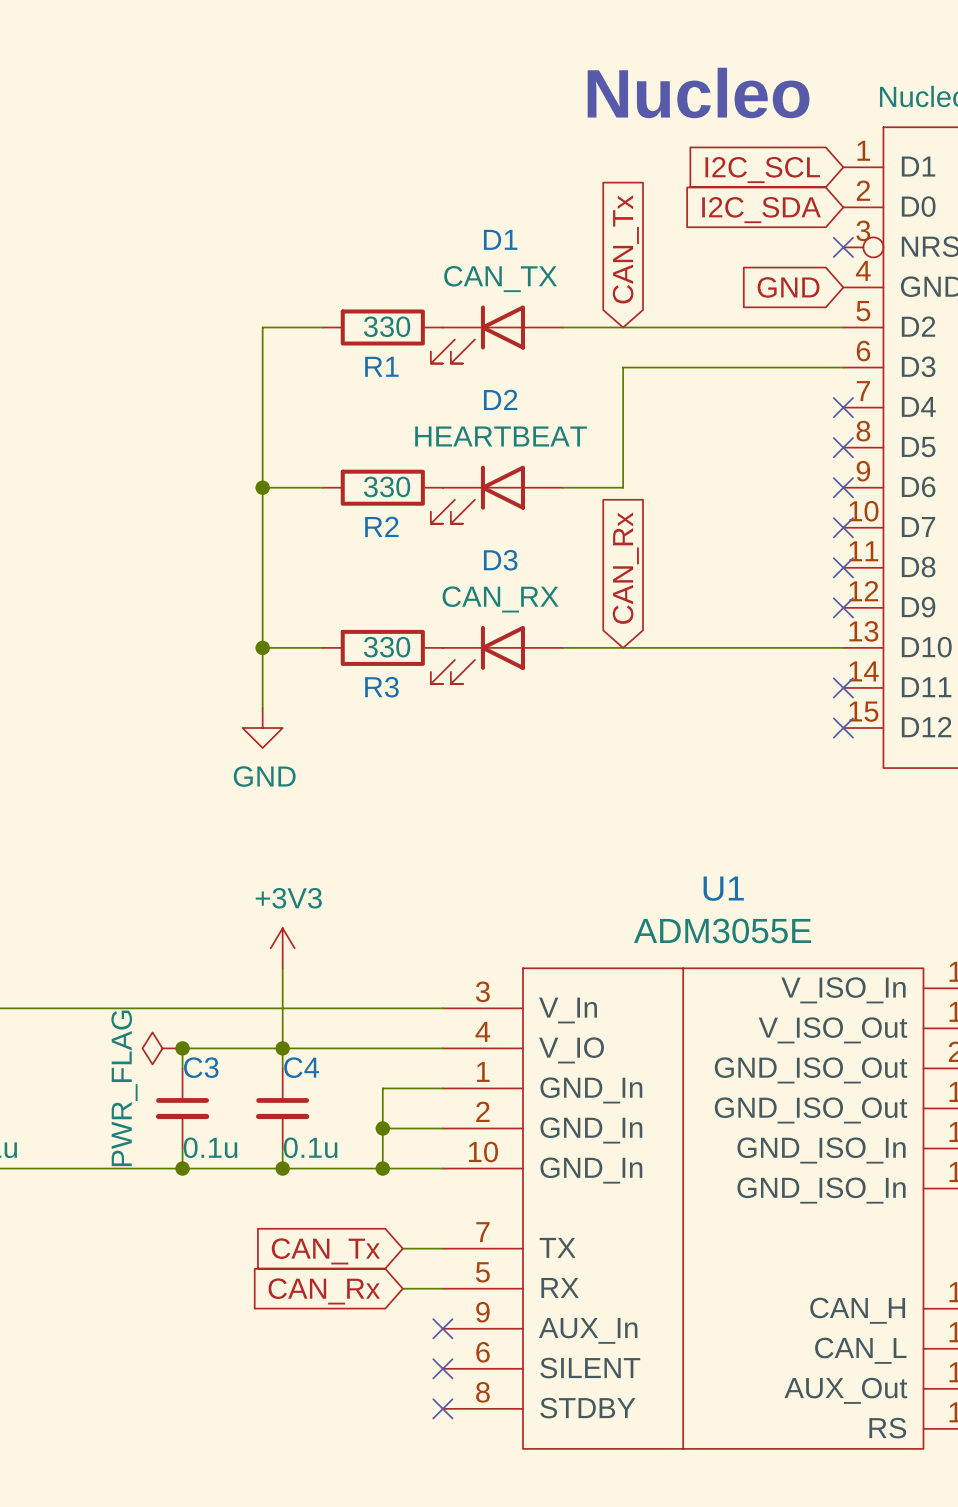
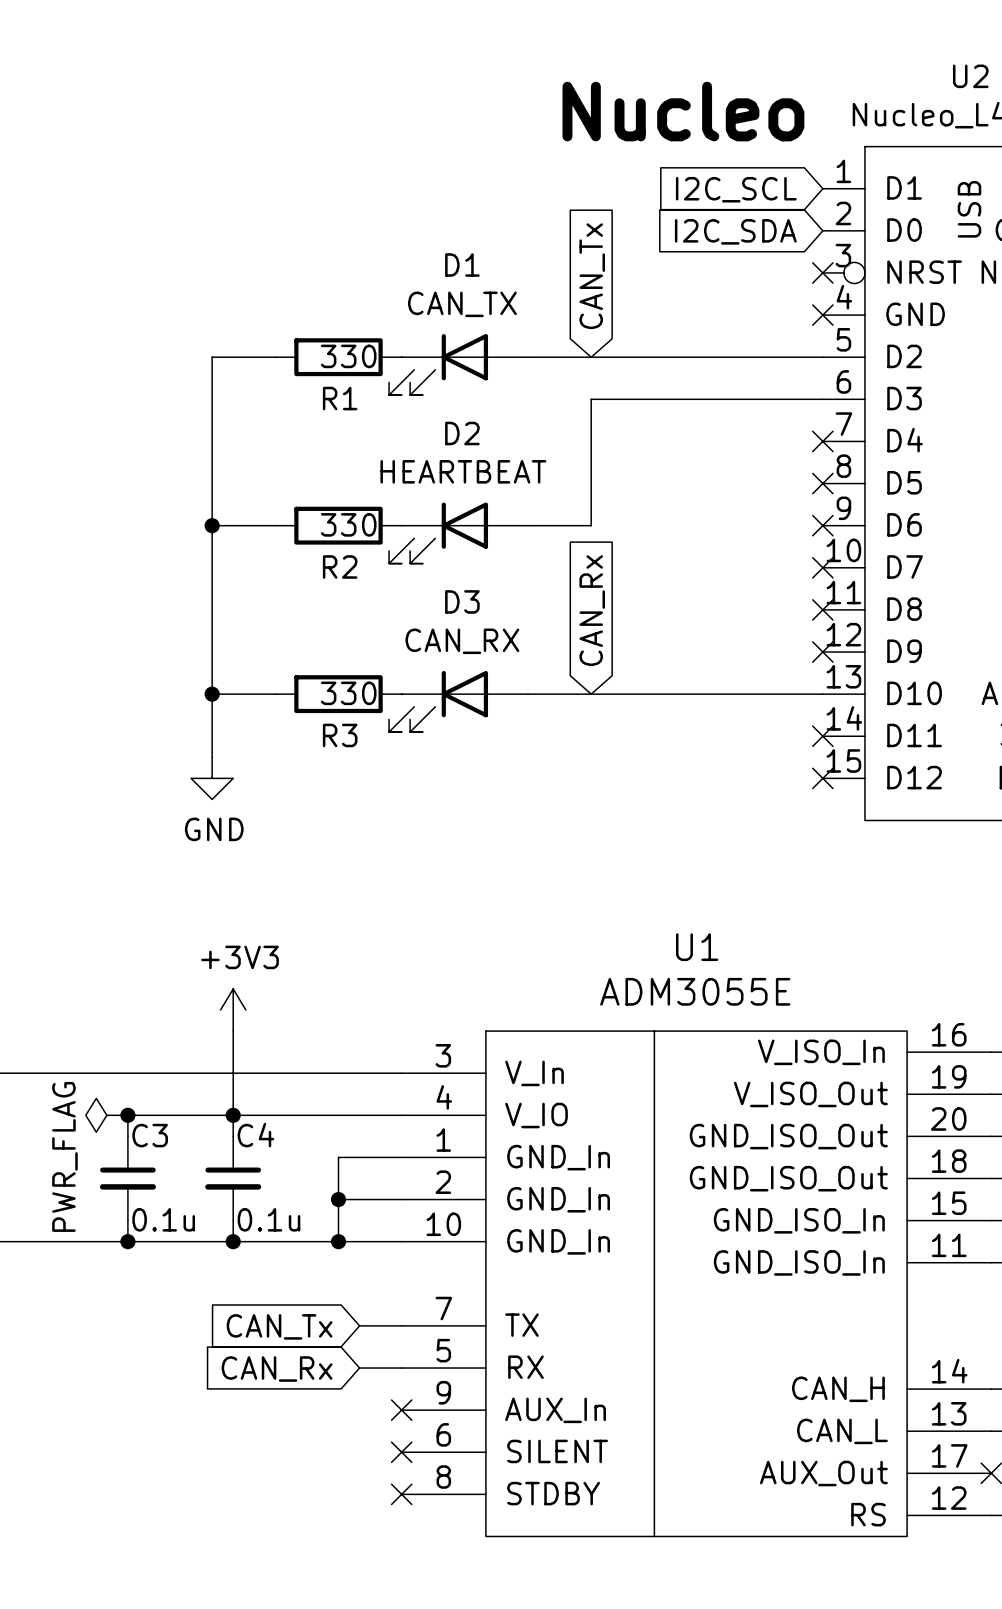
global label: GND (788, 287) -> none
no-connect mark: none -> (822, 315)

